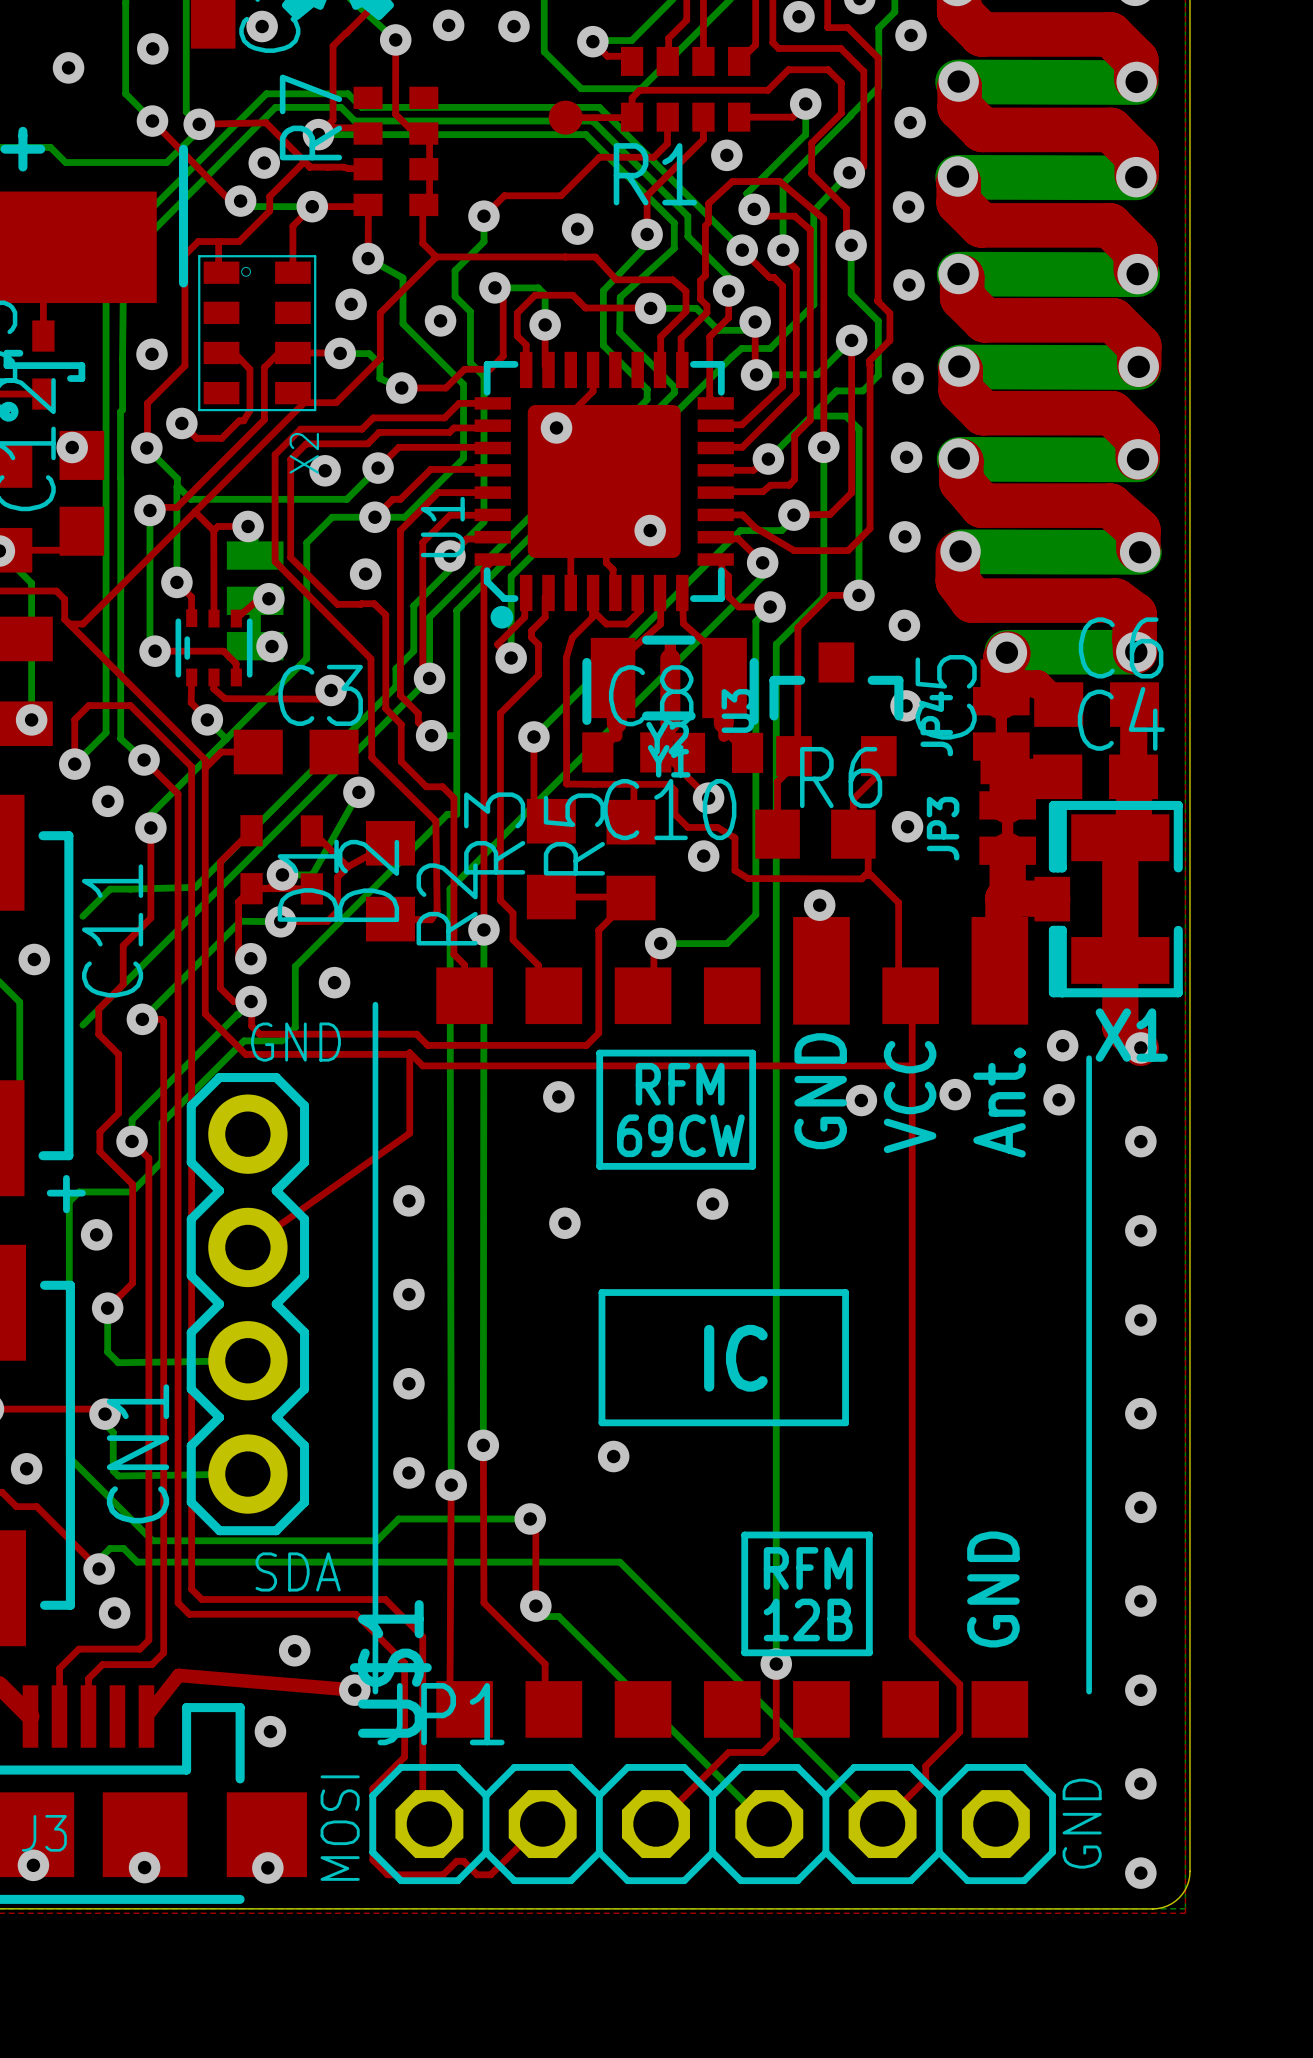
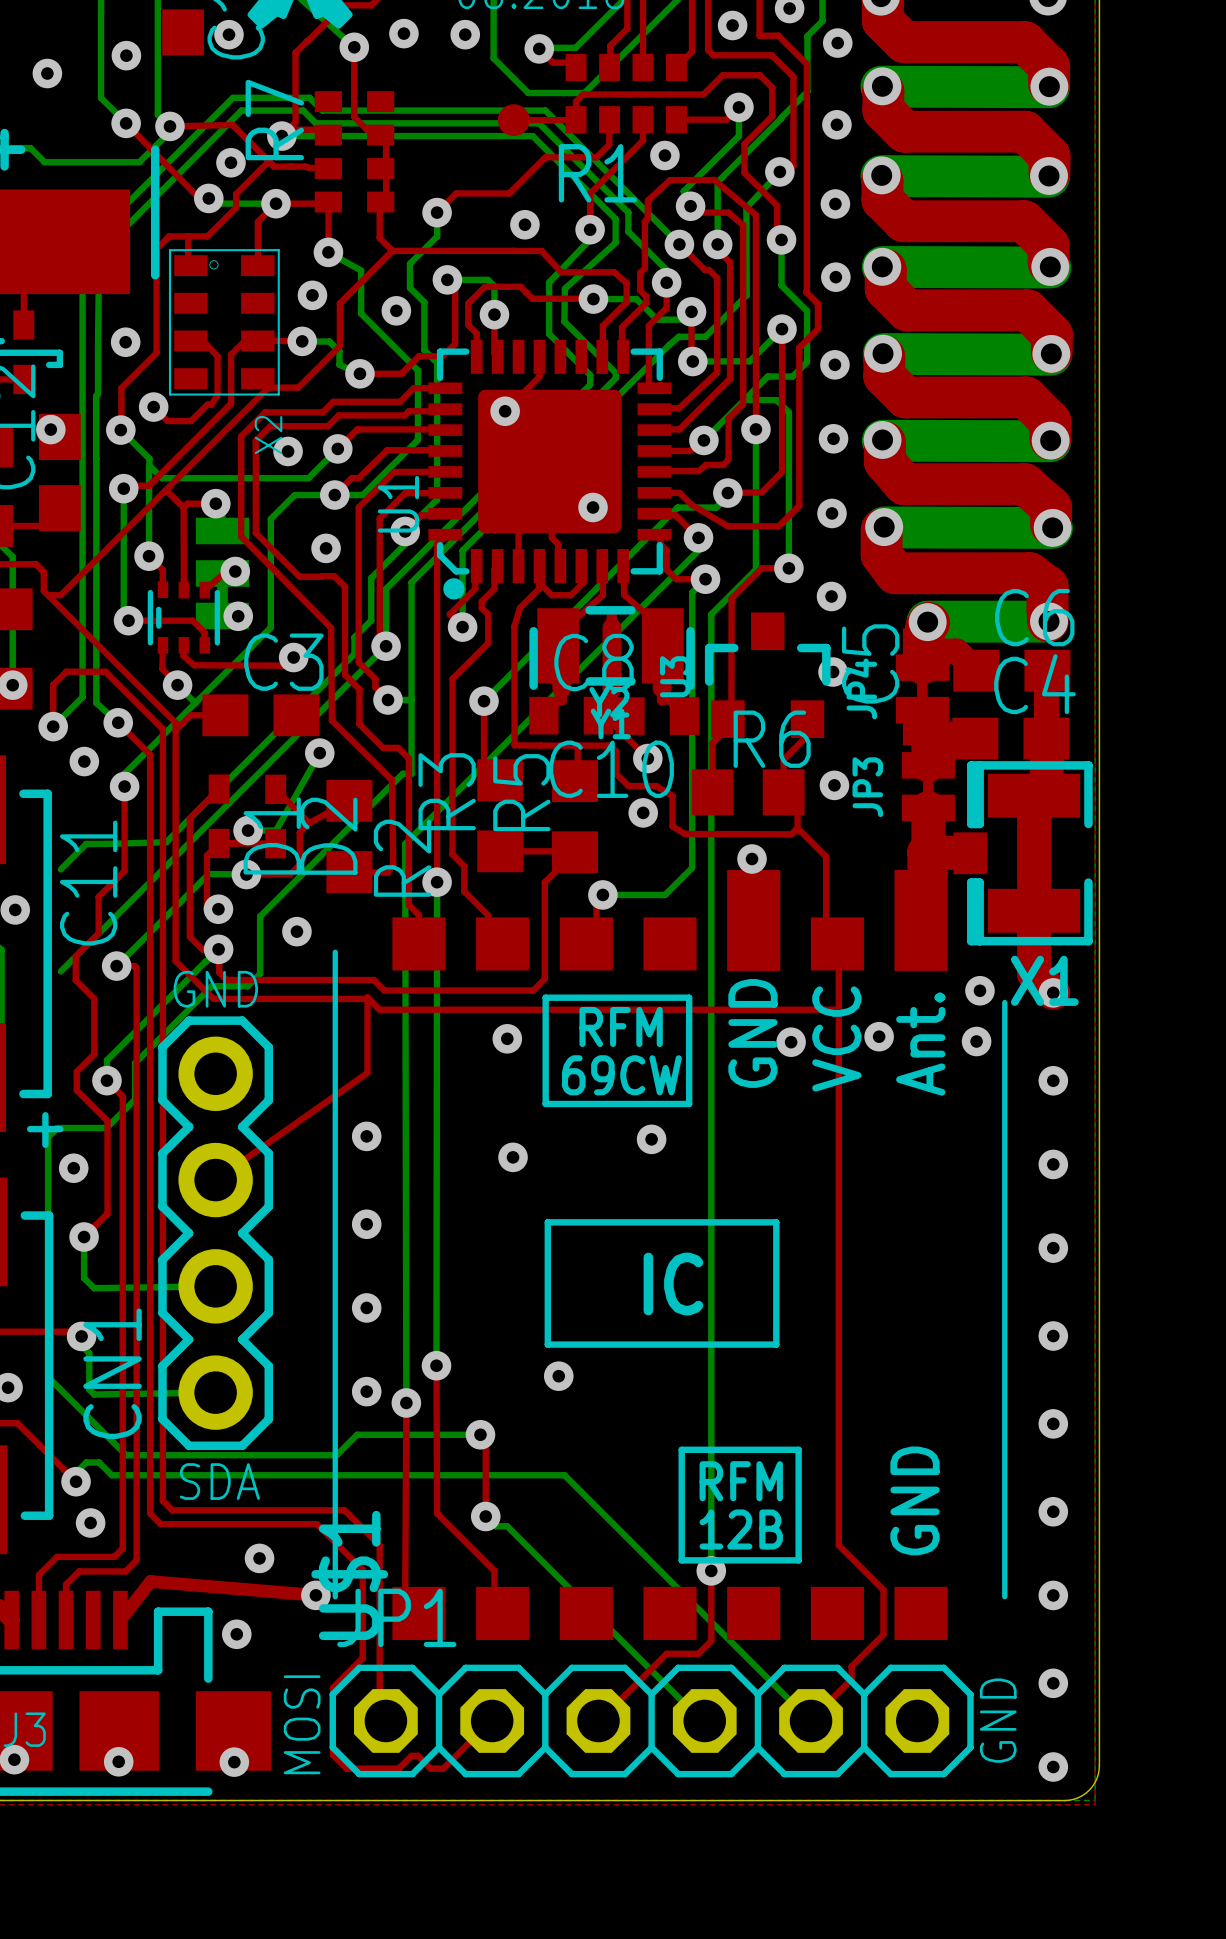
text position: GND (295, 1042) -> GND (215, 989)
text position: SDA (298, 1571) -> SDA (219, 1481)

